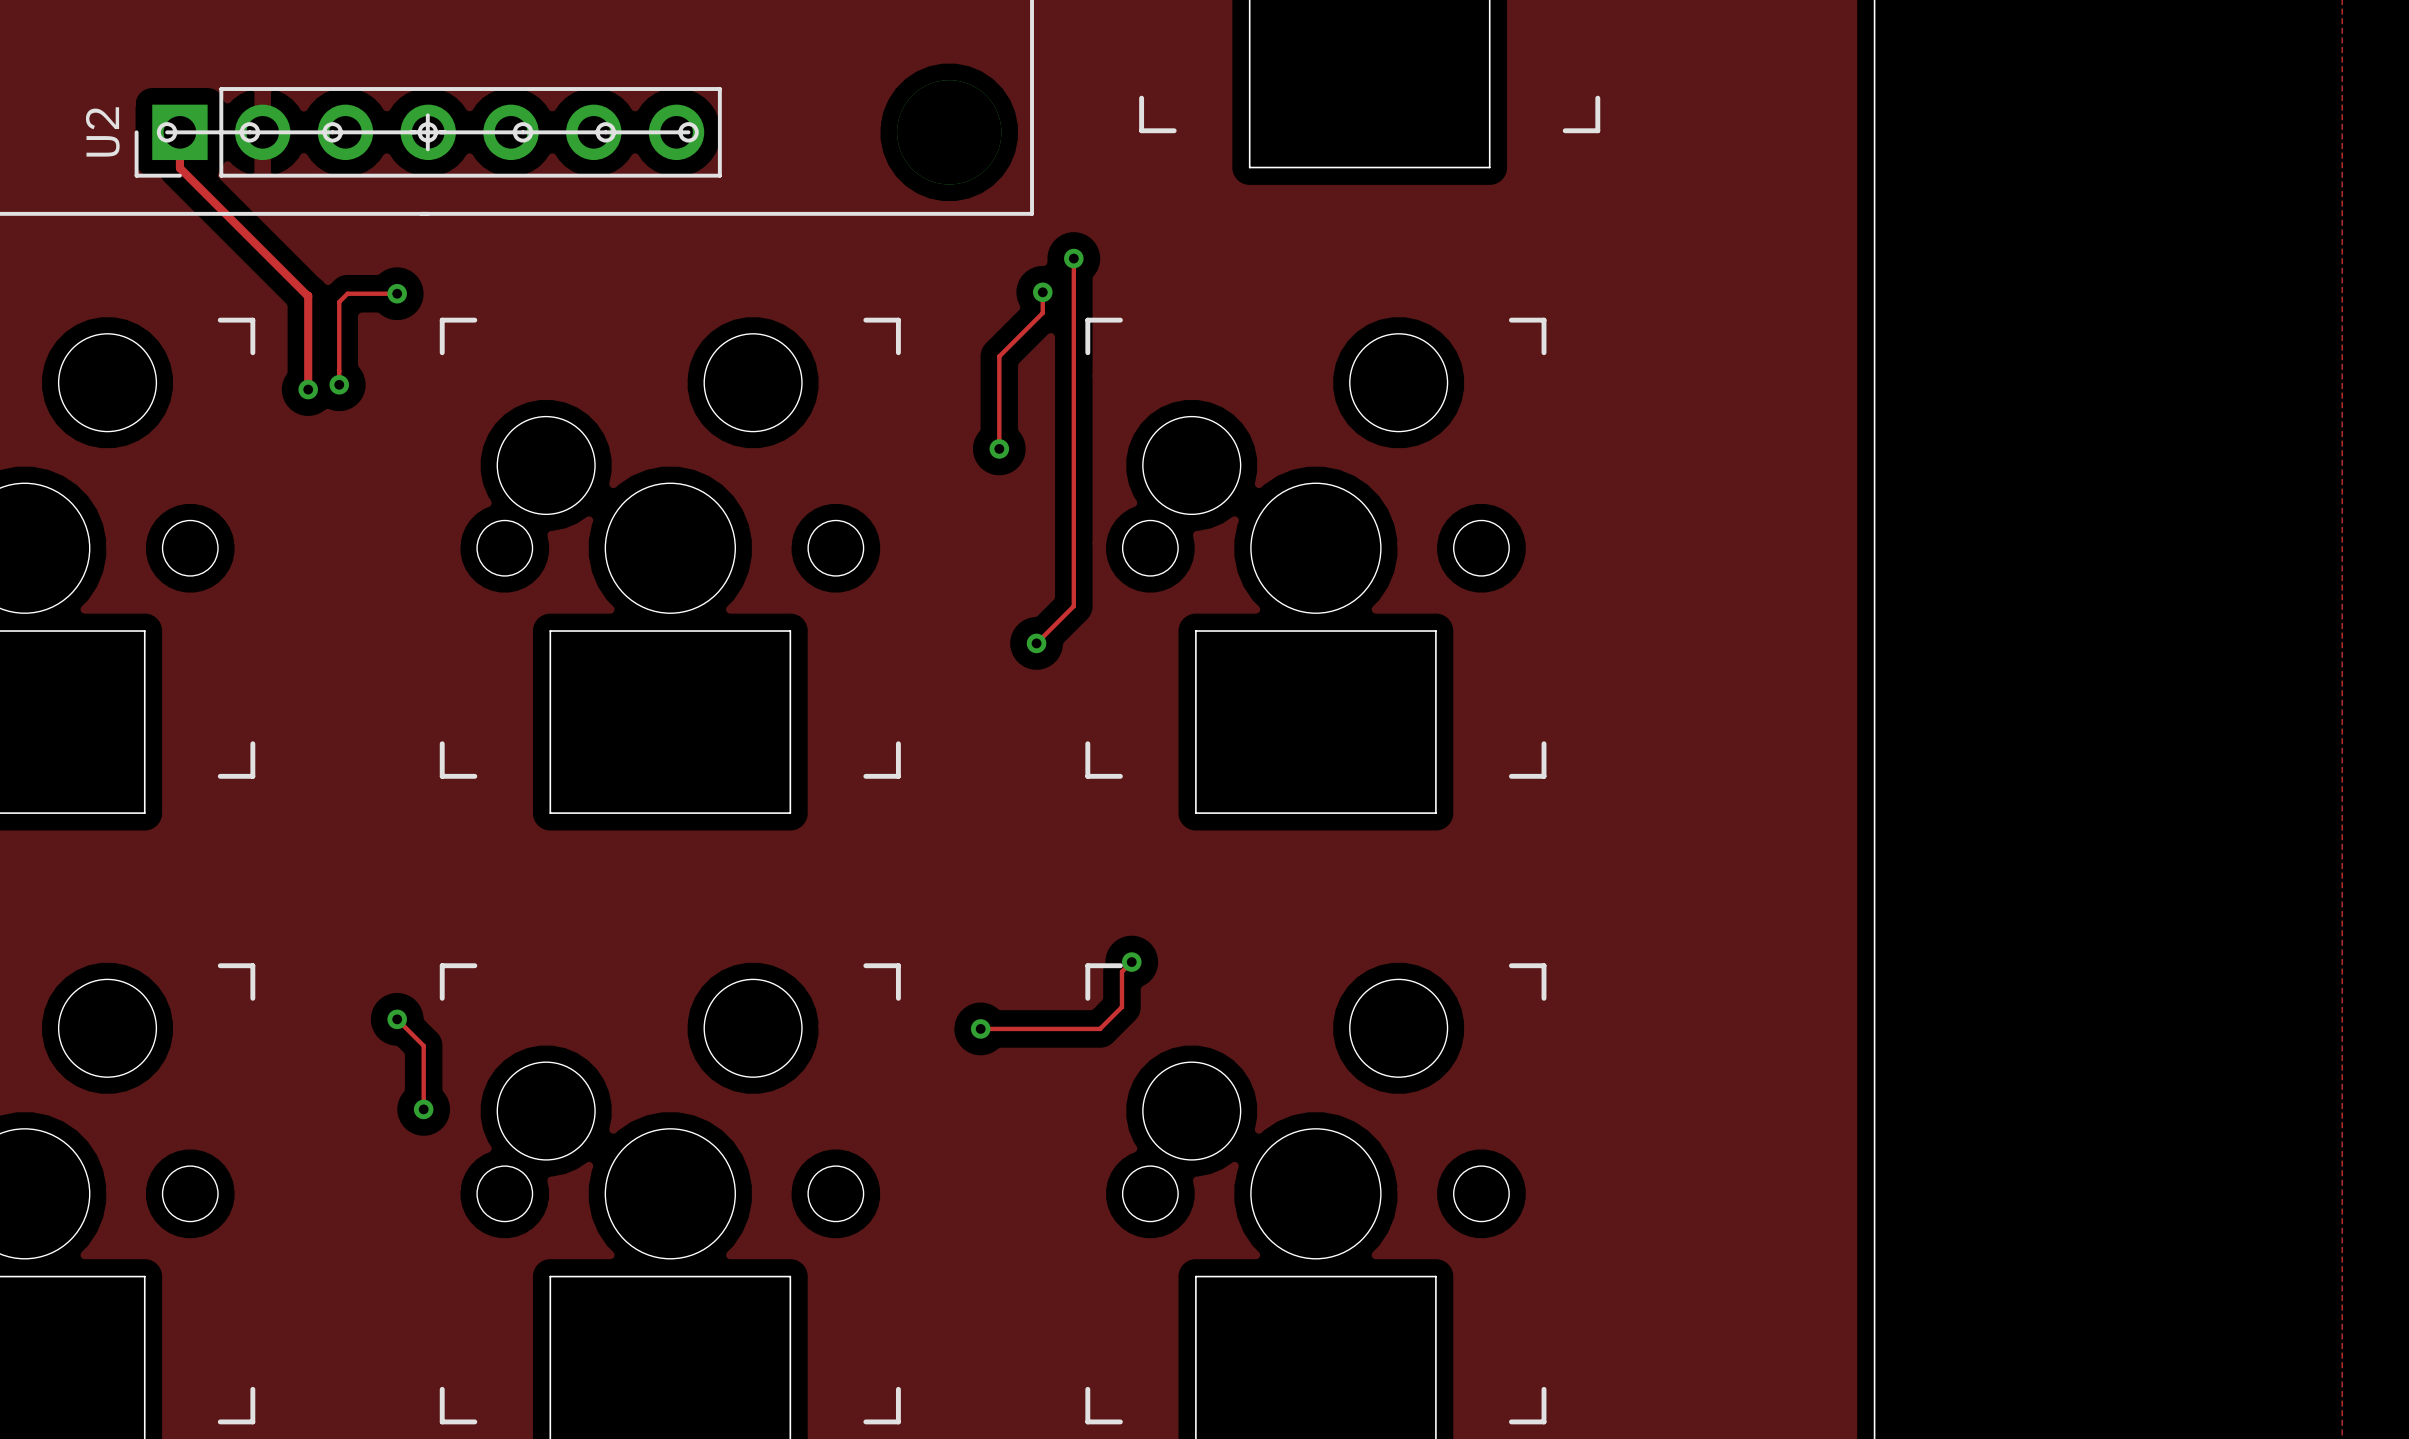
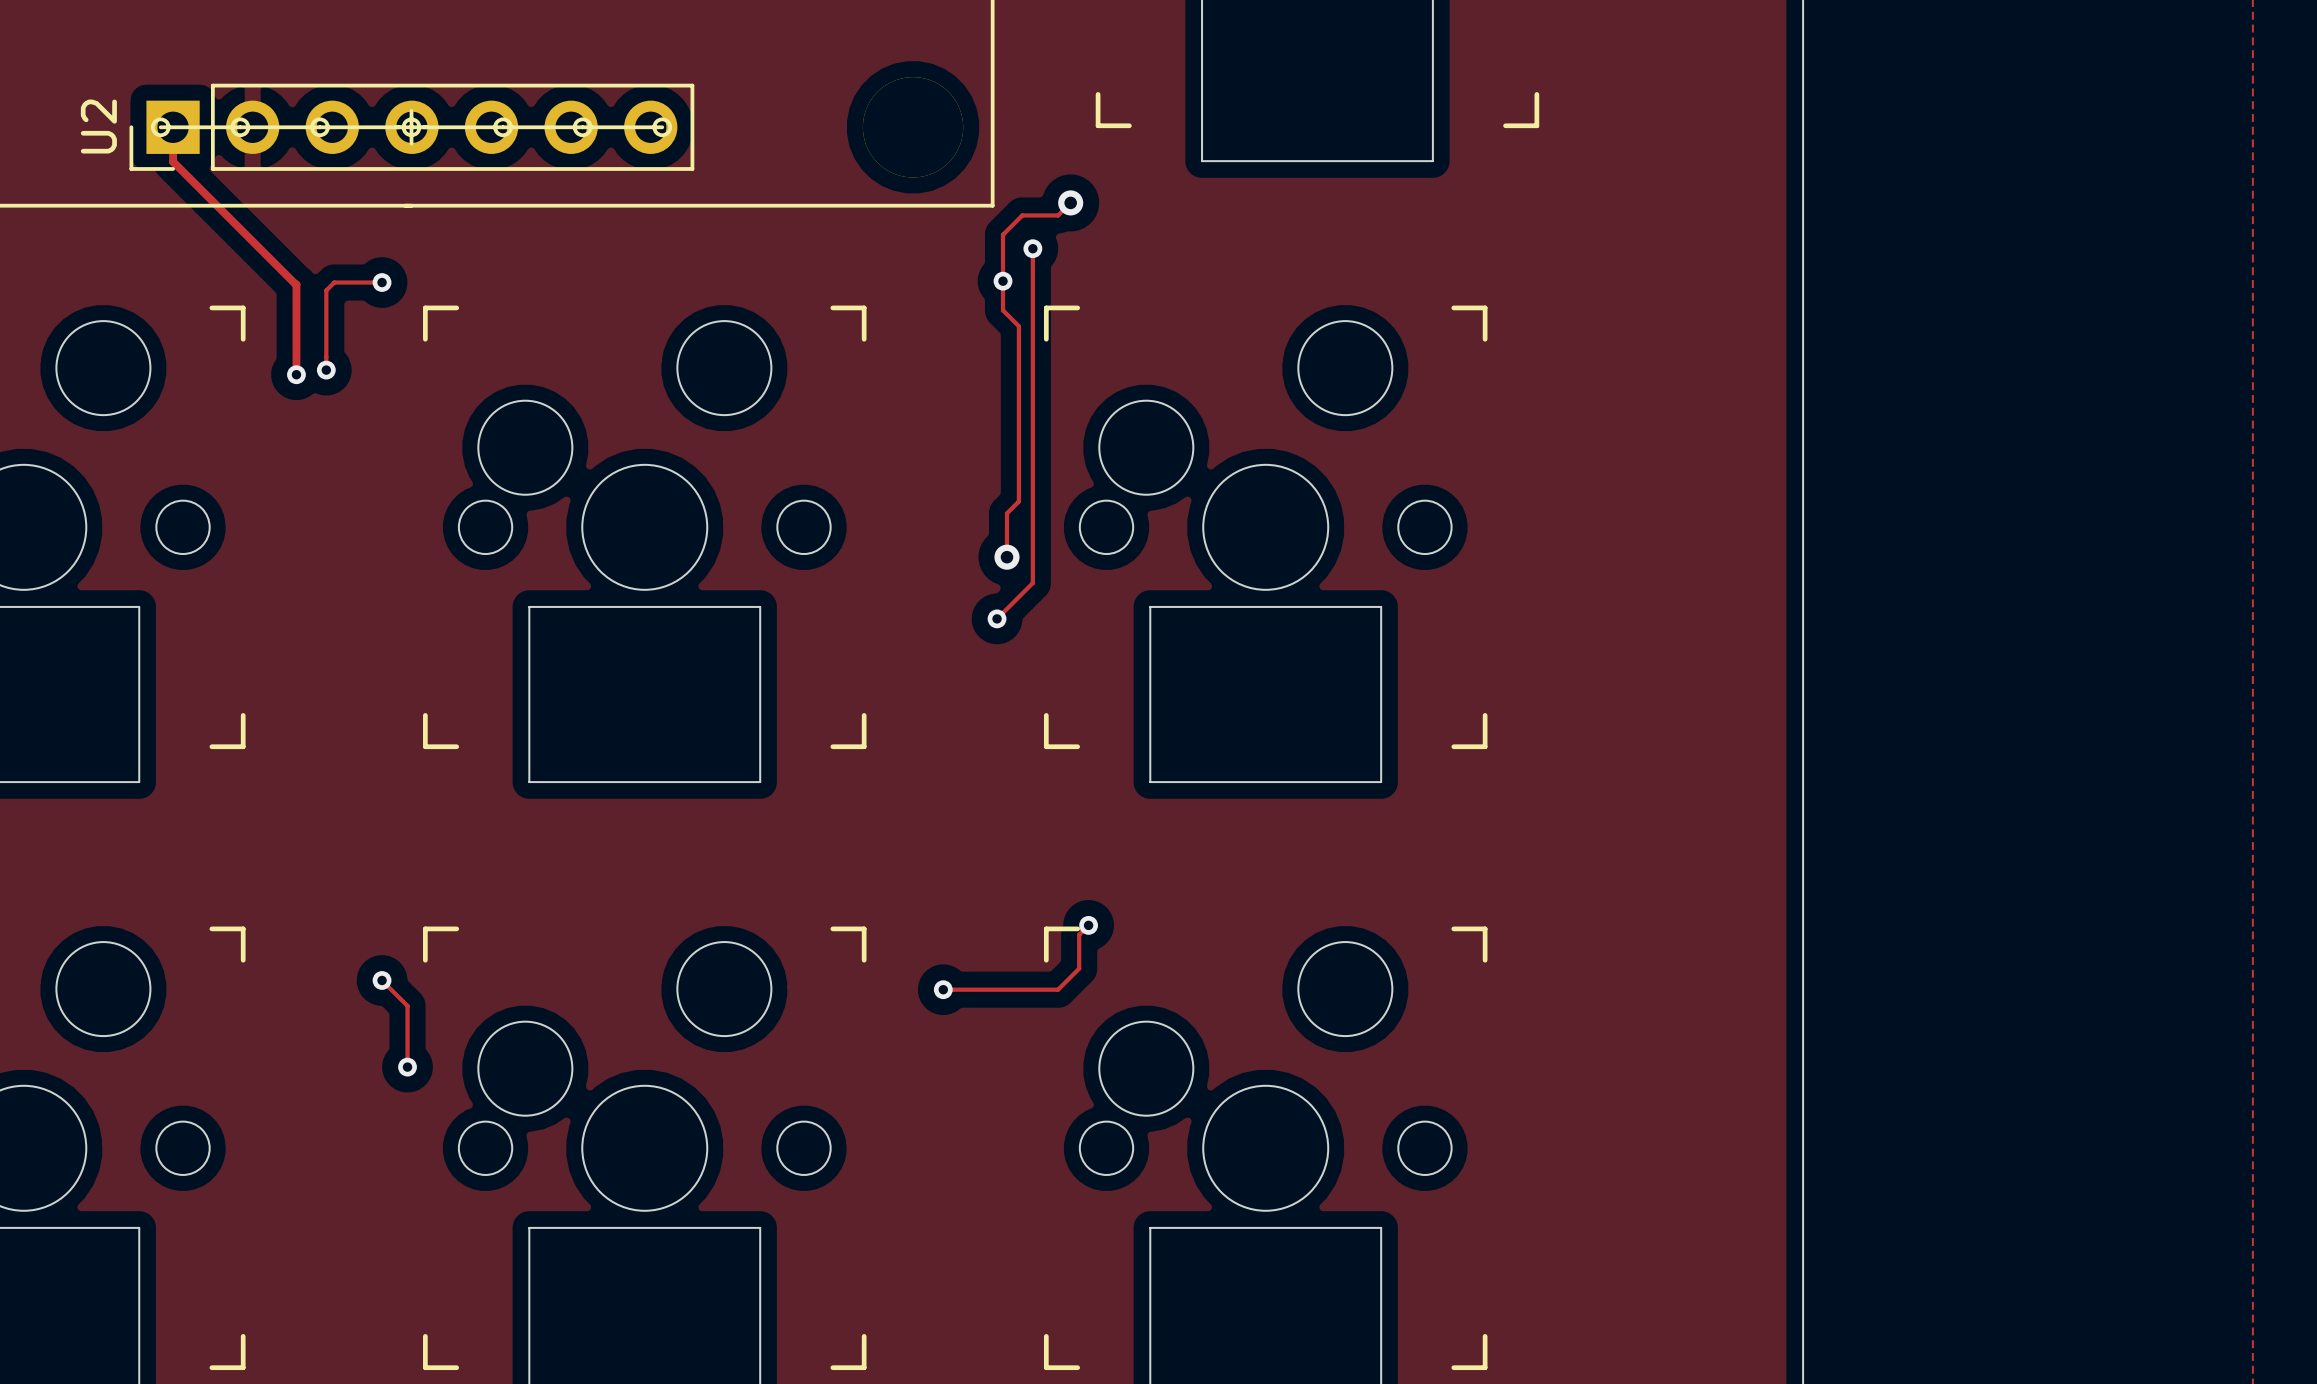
track: none -> (1070, 202) (1058, 215) (1022, 215) (1003, 234) (1003, 281)
via: none -> (1070, 202)
track: (1042, 313) (999, 356) (999, 448) -> (1003, 301) (1003, 310) (1018, 326) (1018, 501) (1006, 513) (1006, 557)
via: (999, 448) -> none
via: none -> (1006, 557)

